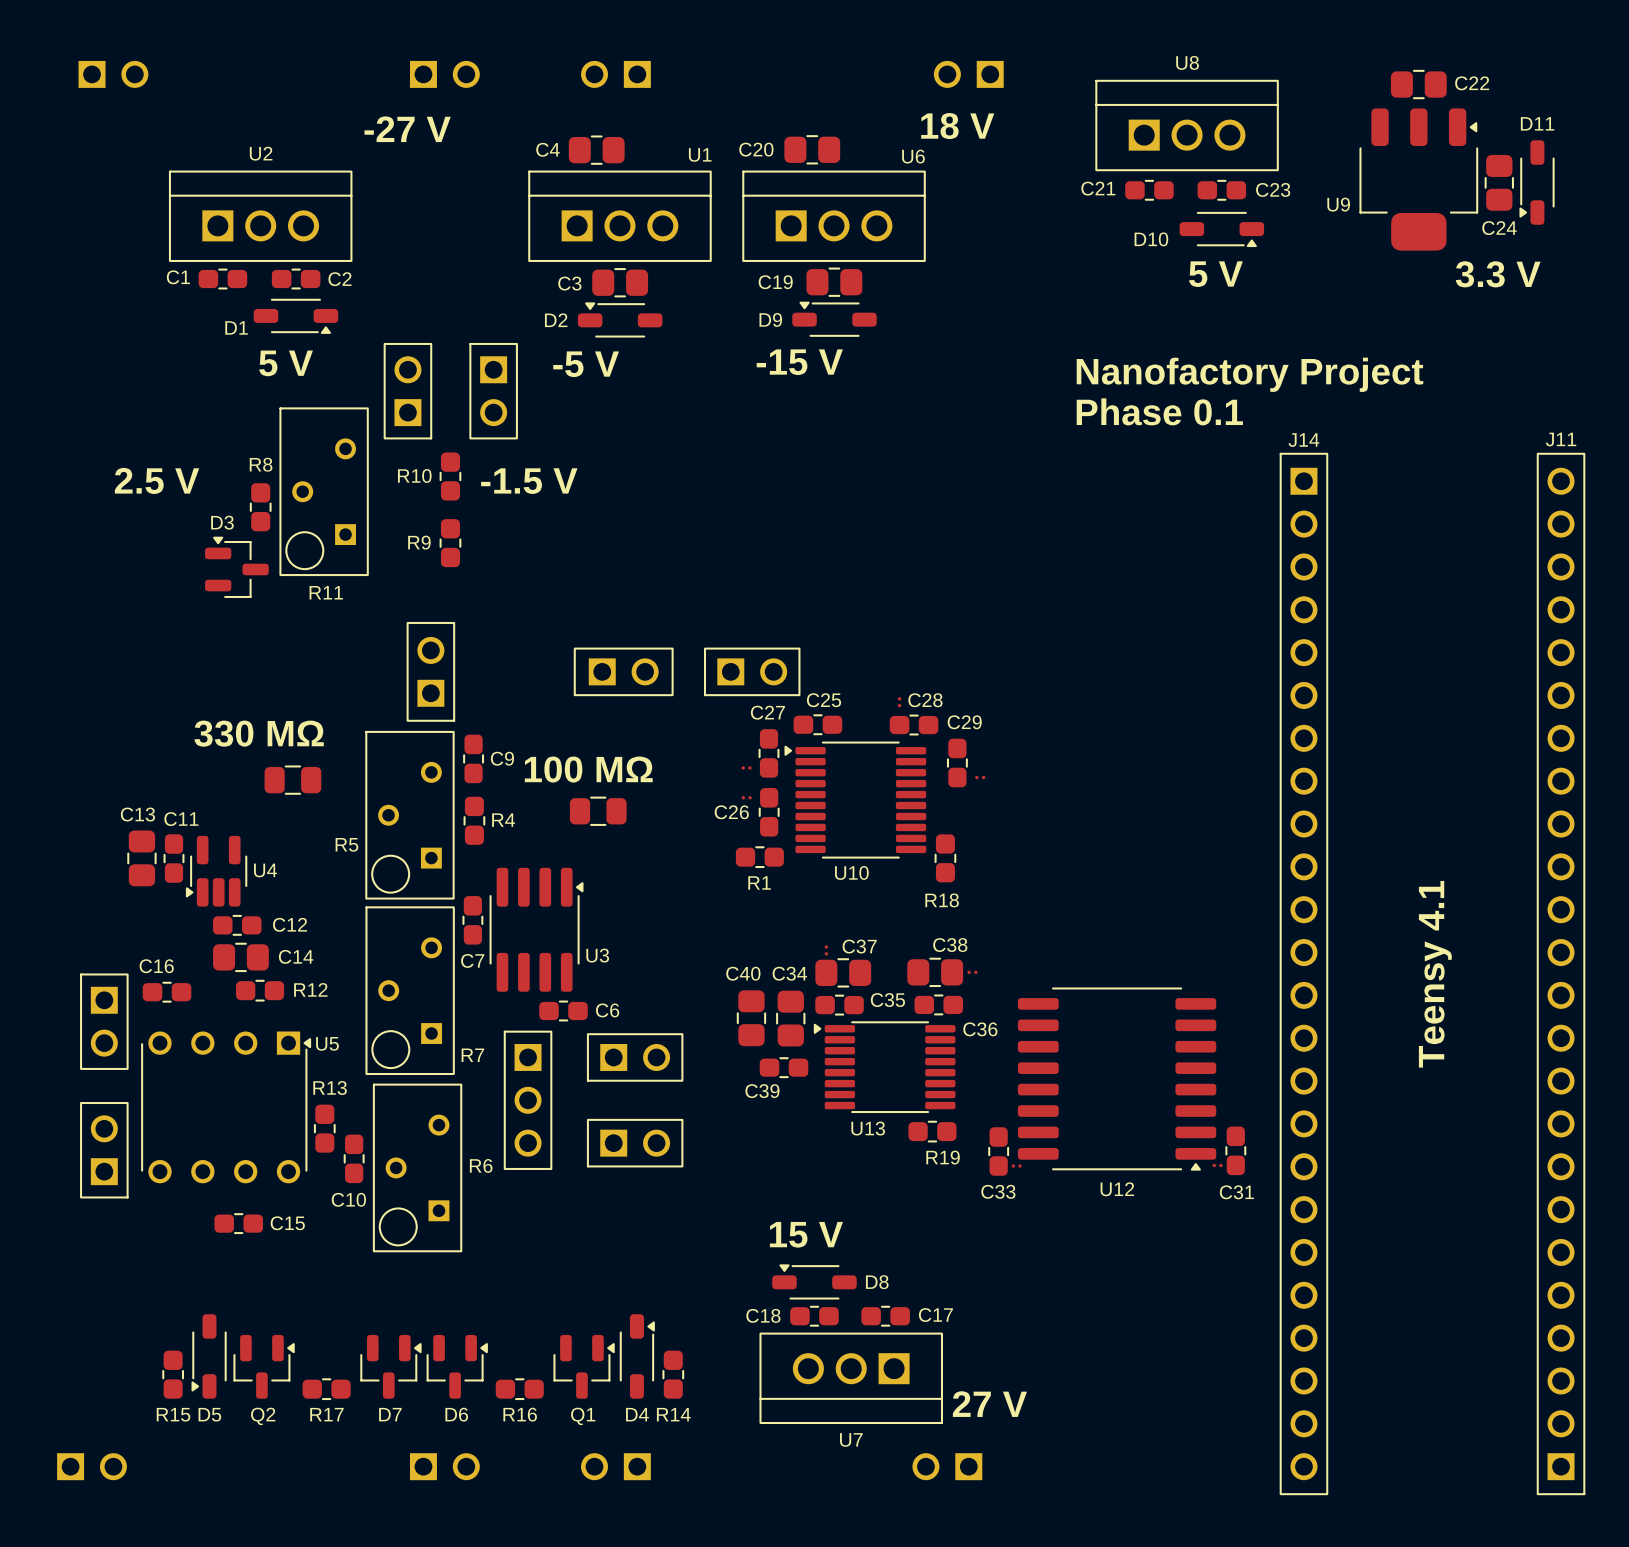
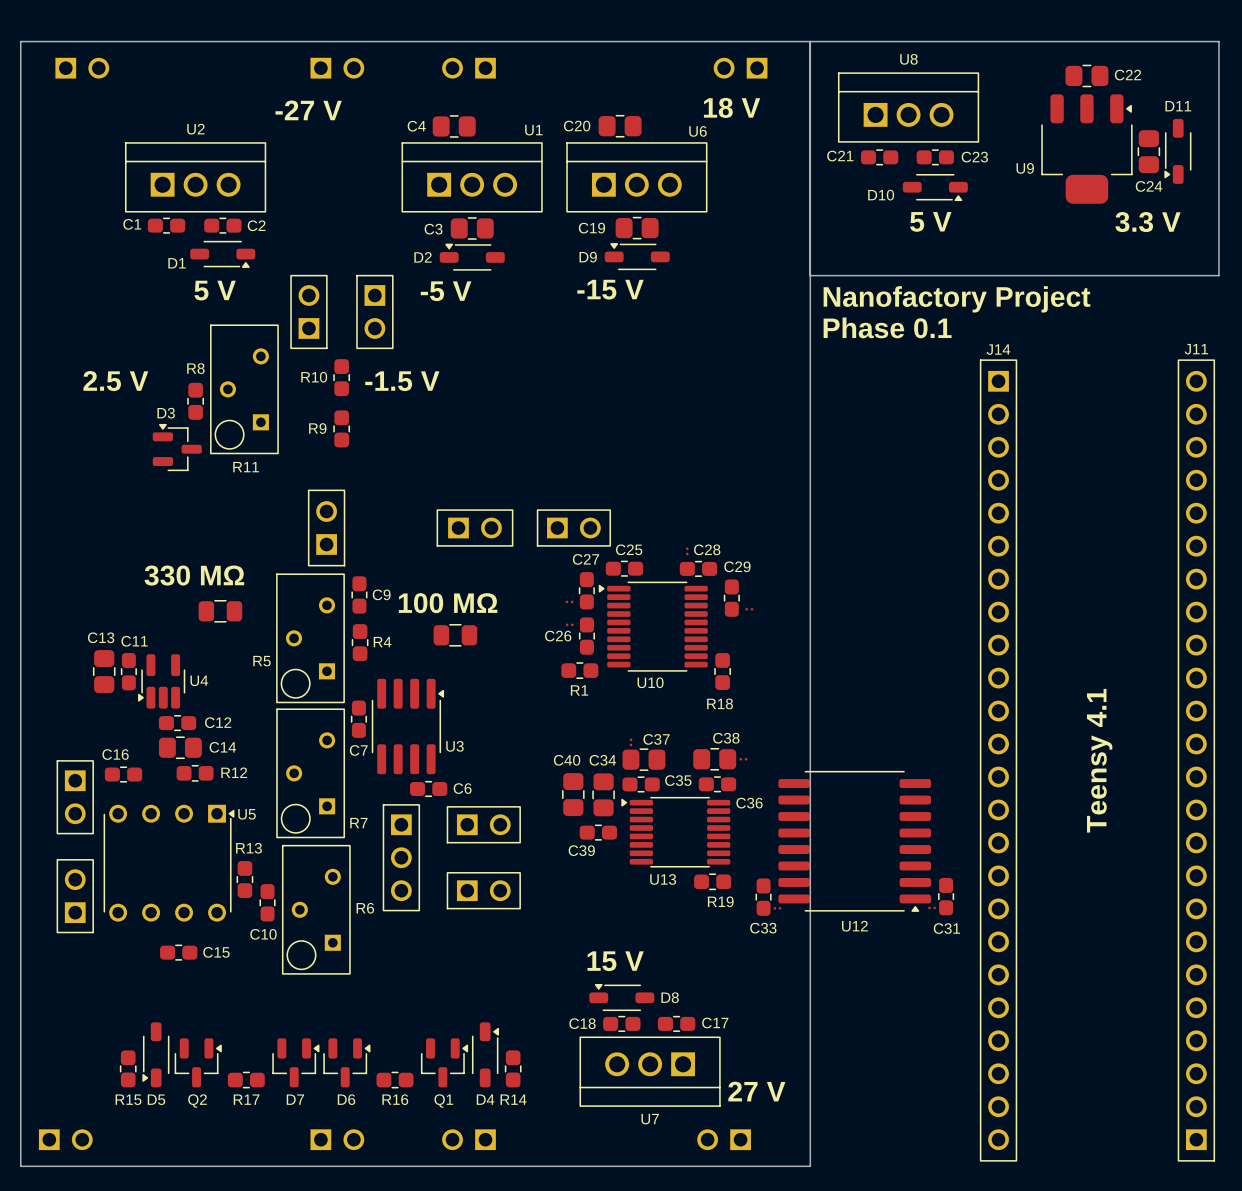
line: none -> (810, 41) (810, 275) (1218, 275) (1218, 41) (20, 41) (20, 1166) (810, 1166) (810, 41)

